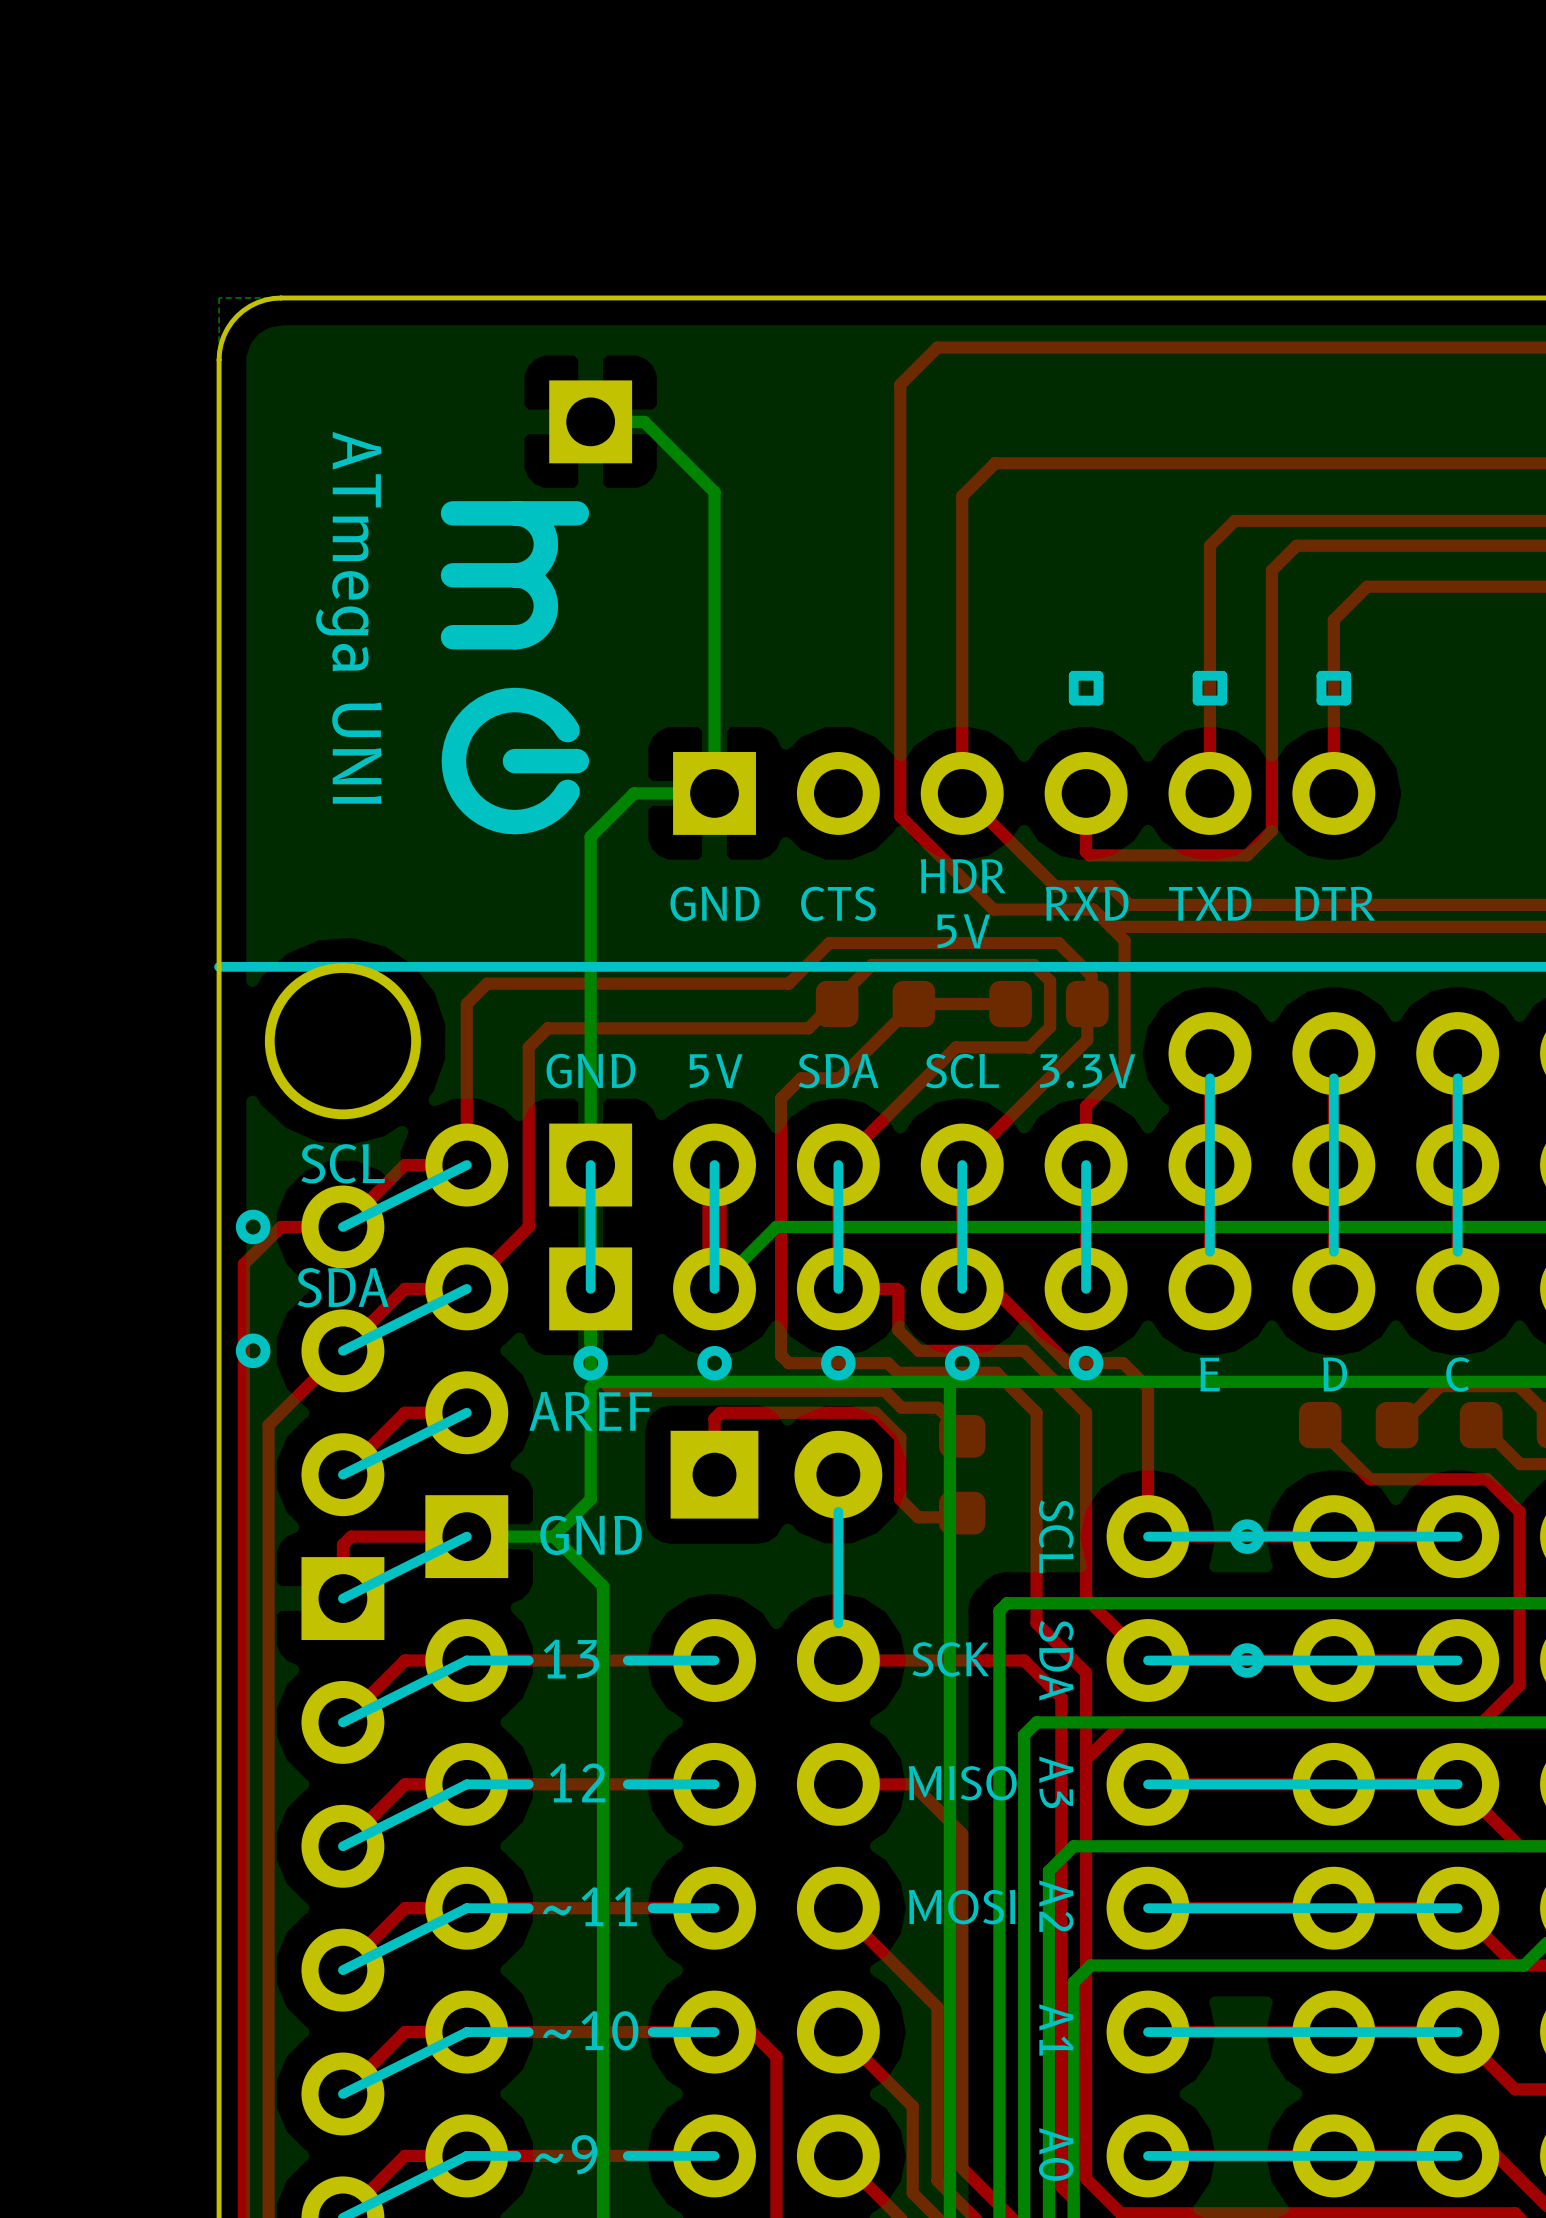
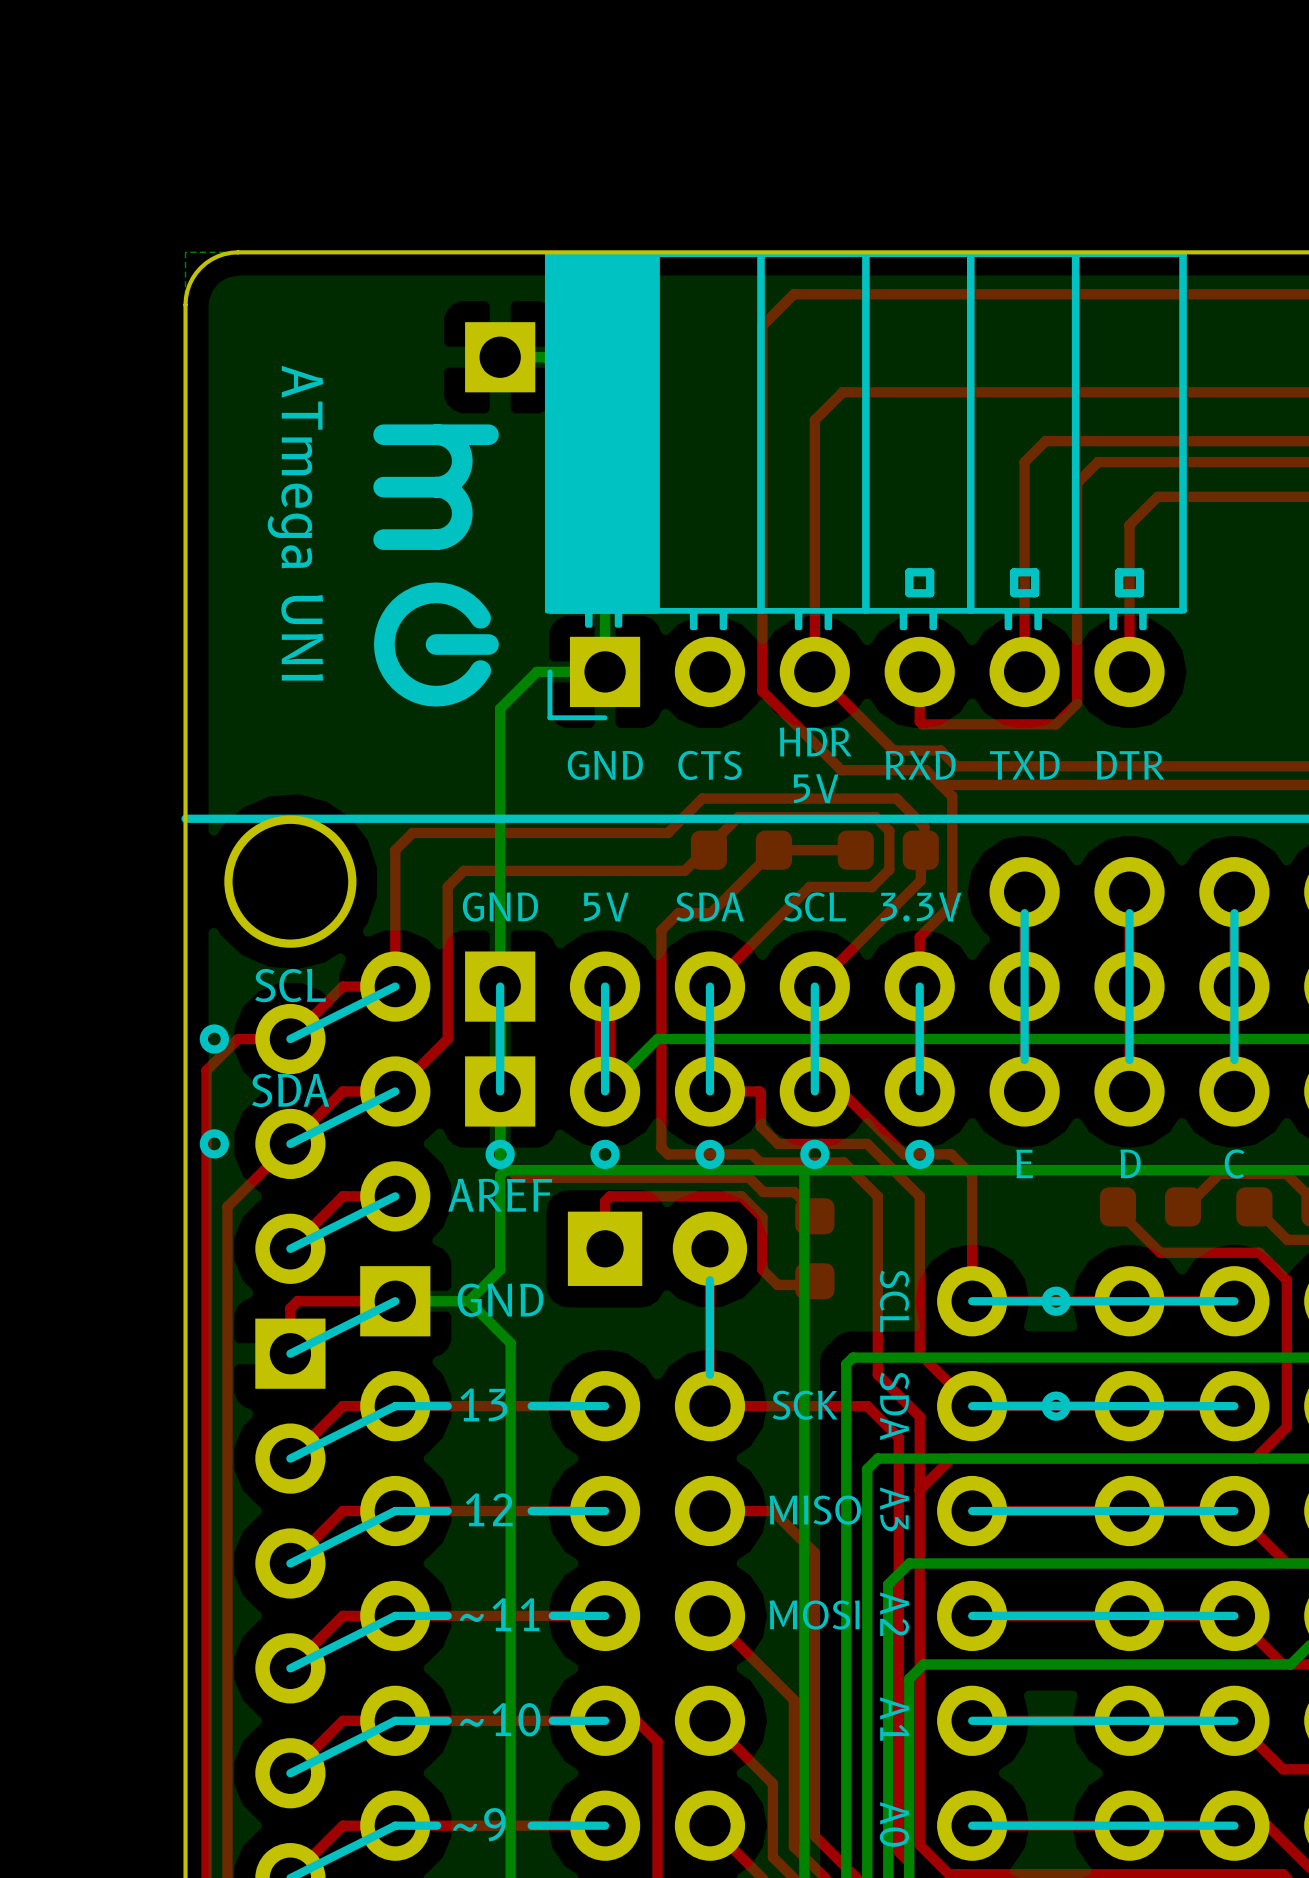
part: none -> (865, 486)

